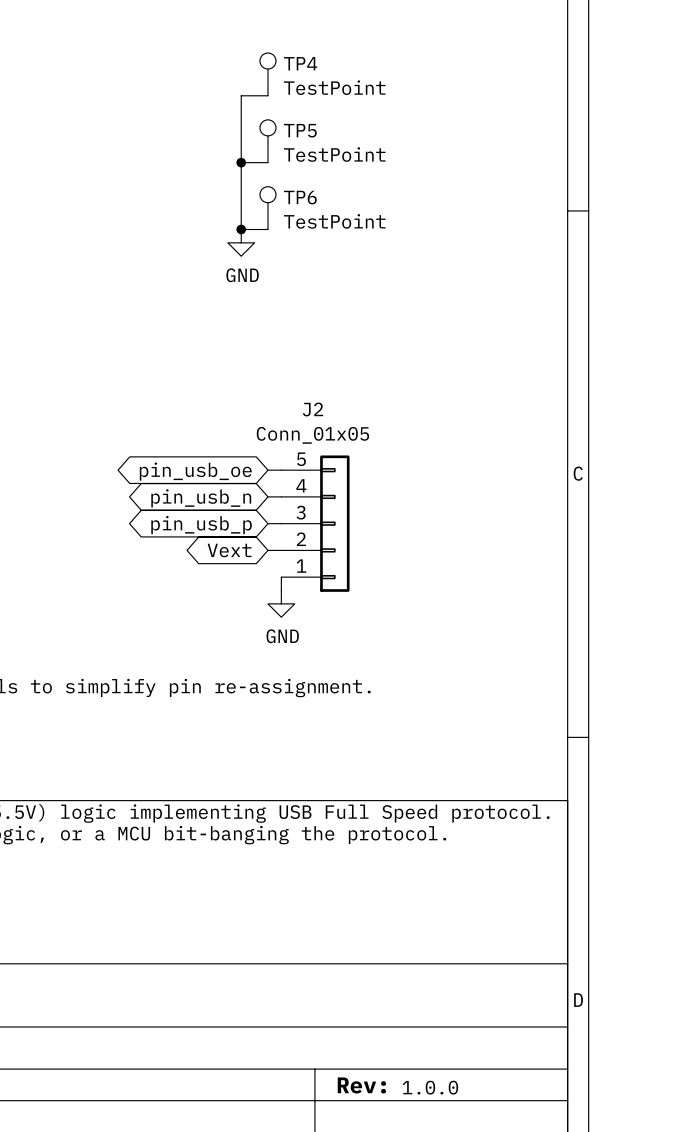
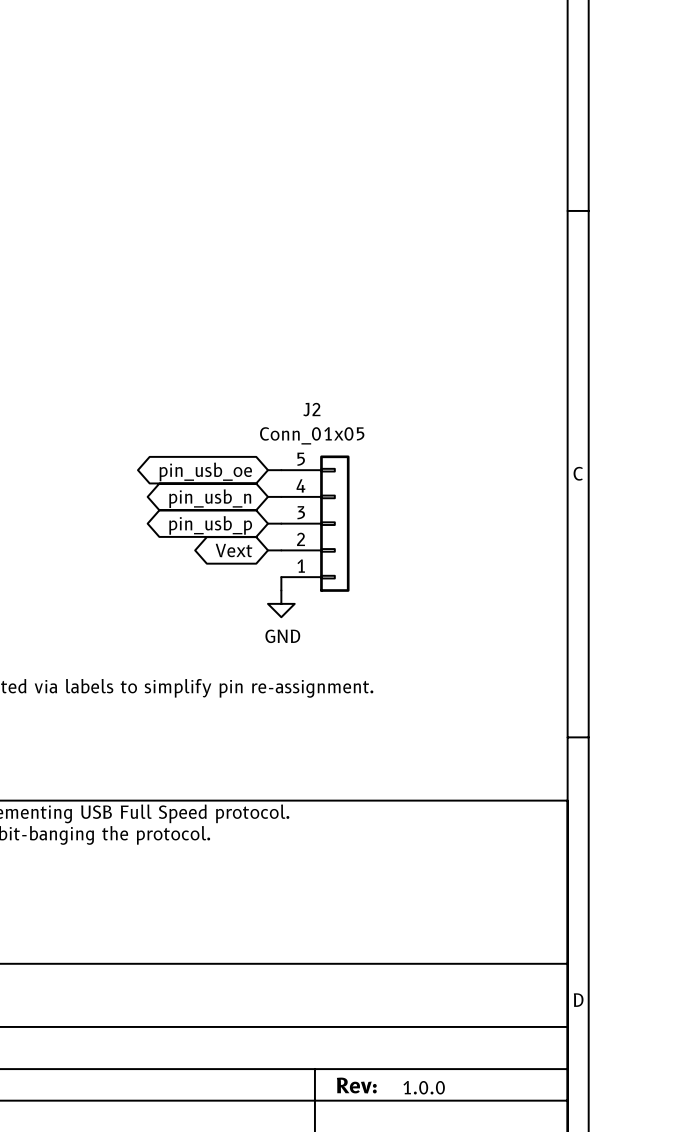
TP4: TestPoint (267, 74) -> none
wire: (267, 95) (241, 95) (241, 229) (267, 229) -> none
TP5: TestPoint (267, 141) -> none
wire: (241, 162) (267, 162) -> none
junction: (241, 162) -> none
TP6: TestPoint (267, 208) -> none
junction: (241, 229) -> none
power symbol: GND (241, 242) -> none

